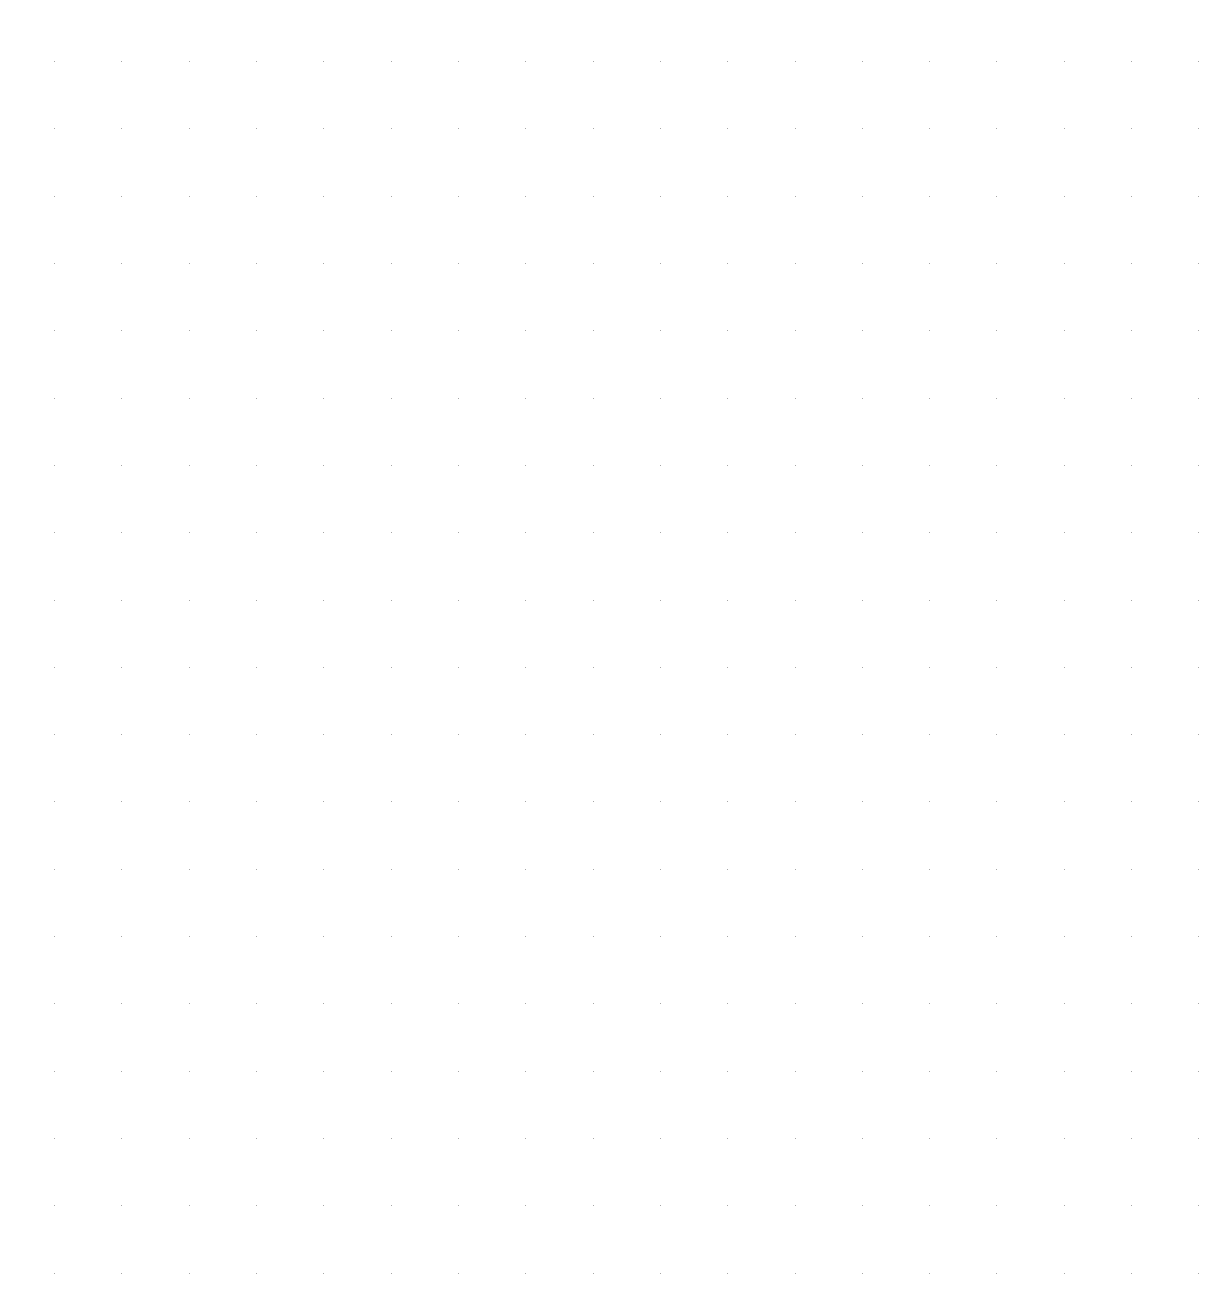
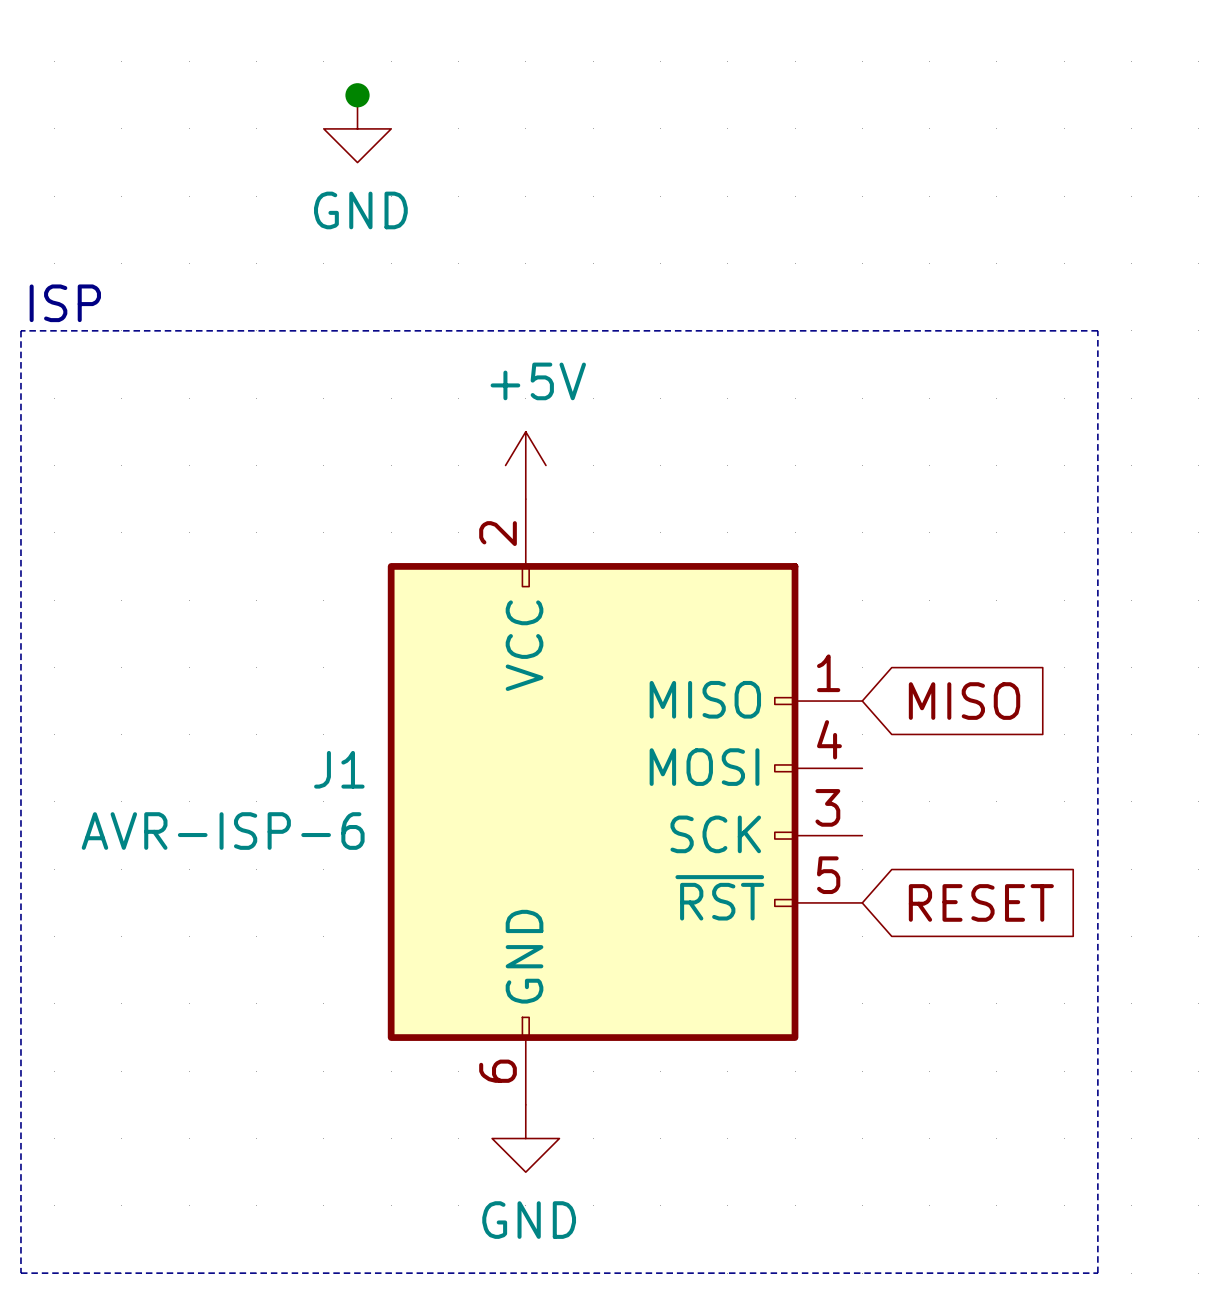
junction: none -> (357, 95)
power symbol: none -> GND (357, 128)
text: none -> ISP (65, 303)
line: none -> (20, 330) (1097, 330) (1097, 1273) (20, 1273) (20, 330)
power symbol: none -> +5V (525, 465)
global label: none -> MISO (964, 701)
J1: none -> AVR-ISP-6 (625, 801)
global label: none -> RESET (981, 902)
power symbol: none -> GND (525, 1138)

